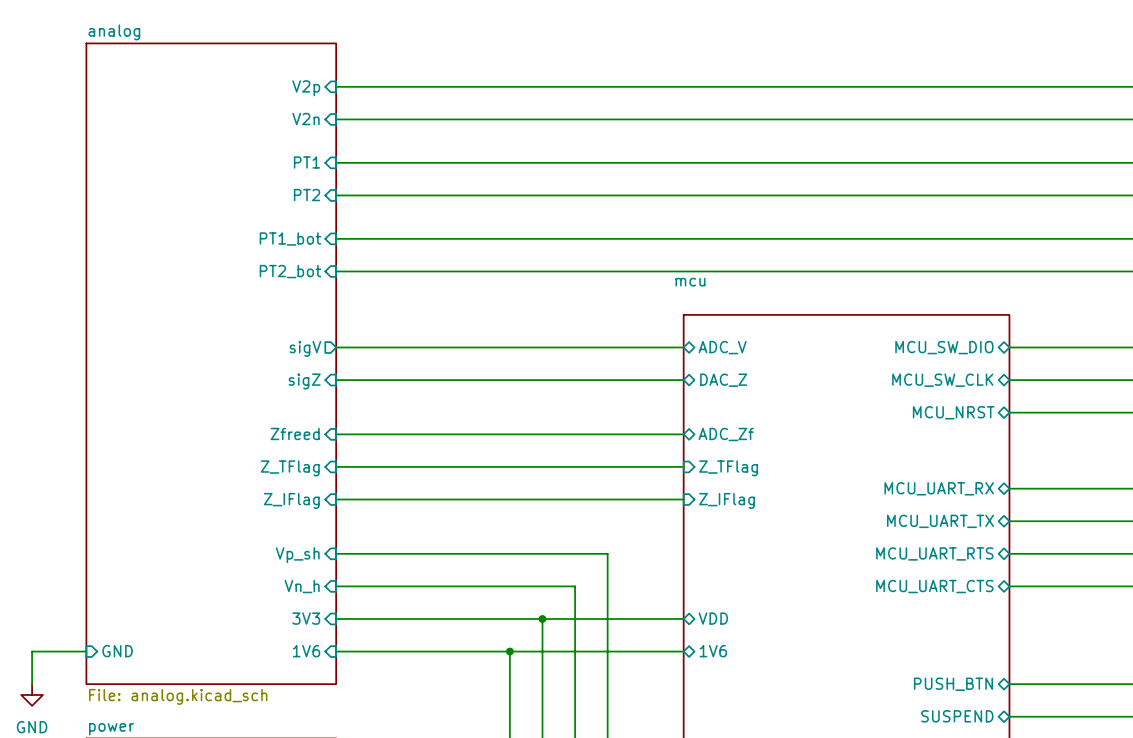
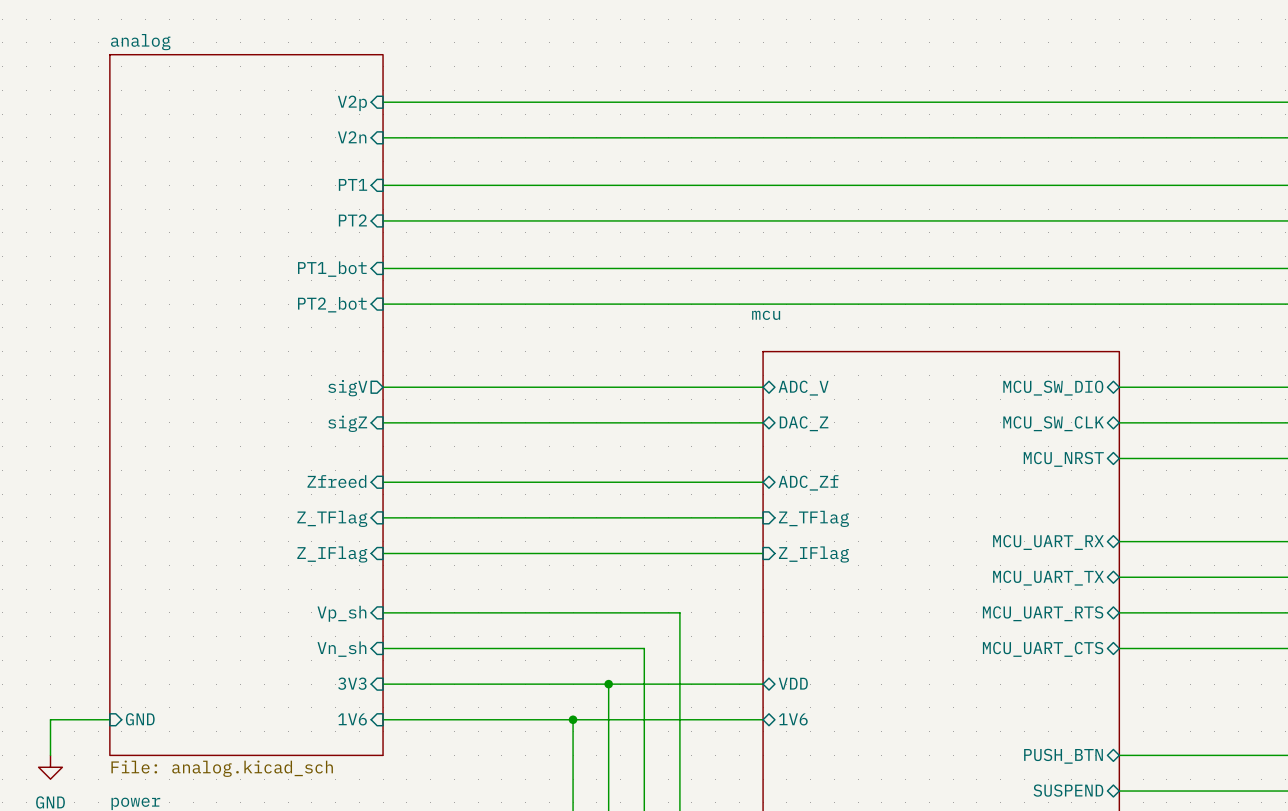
sheet pin: Vn_h (302, 586) -> Vn_sh (341, 649)

